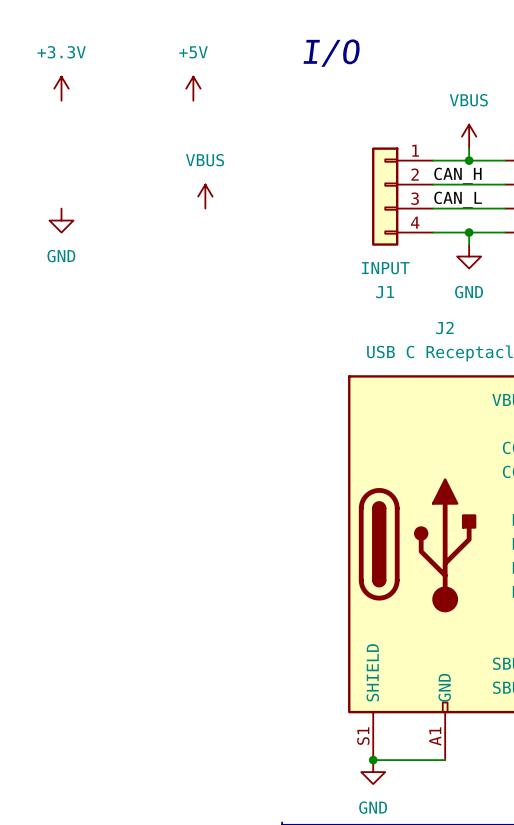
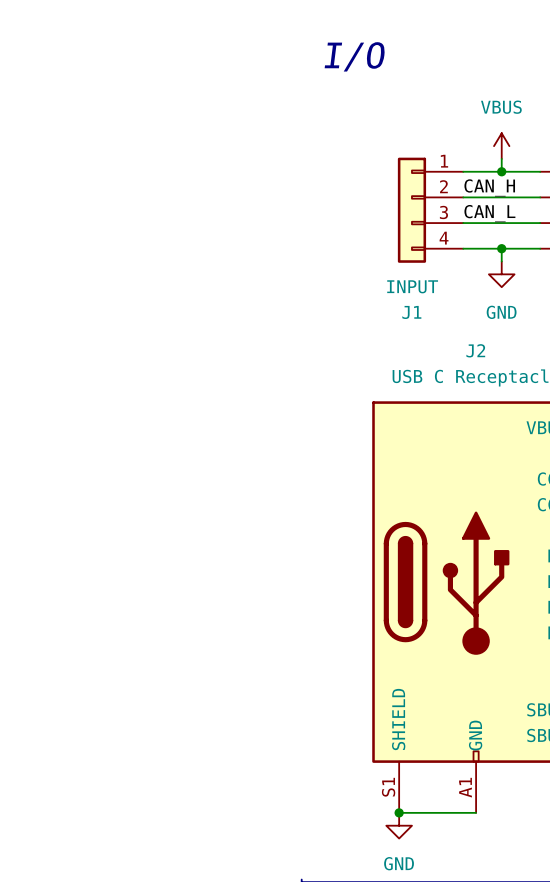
power symbol: +3.3V (61, 88) -> none
power symbol: +5V (193, 88) -> none
power symbol: VBUS (205, 196) -> none
power symbol: GND (61, 220) -> none

